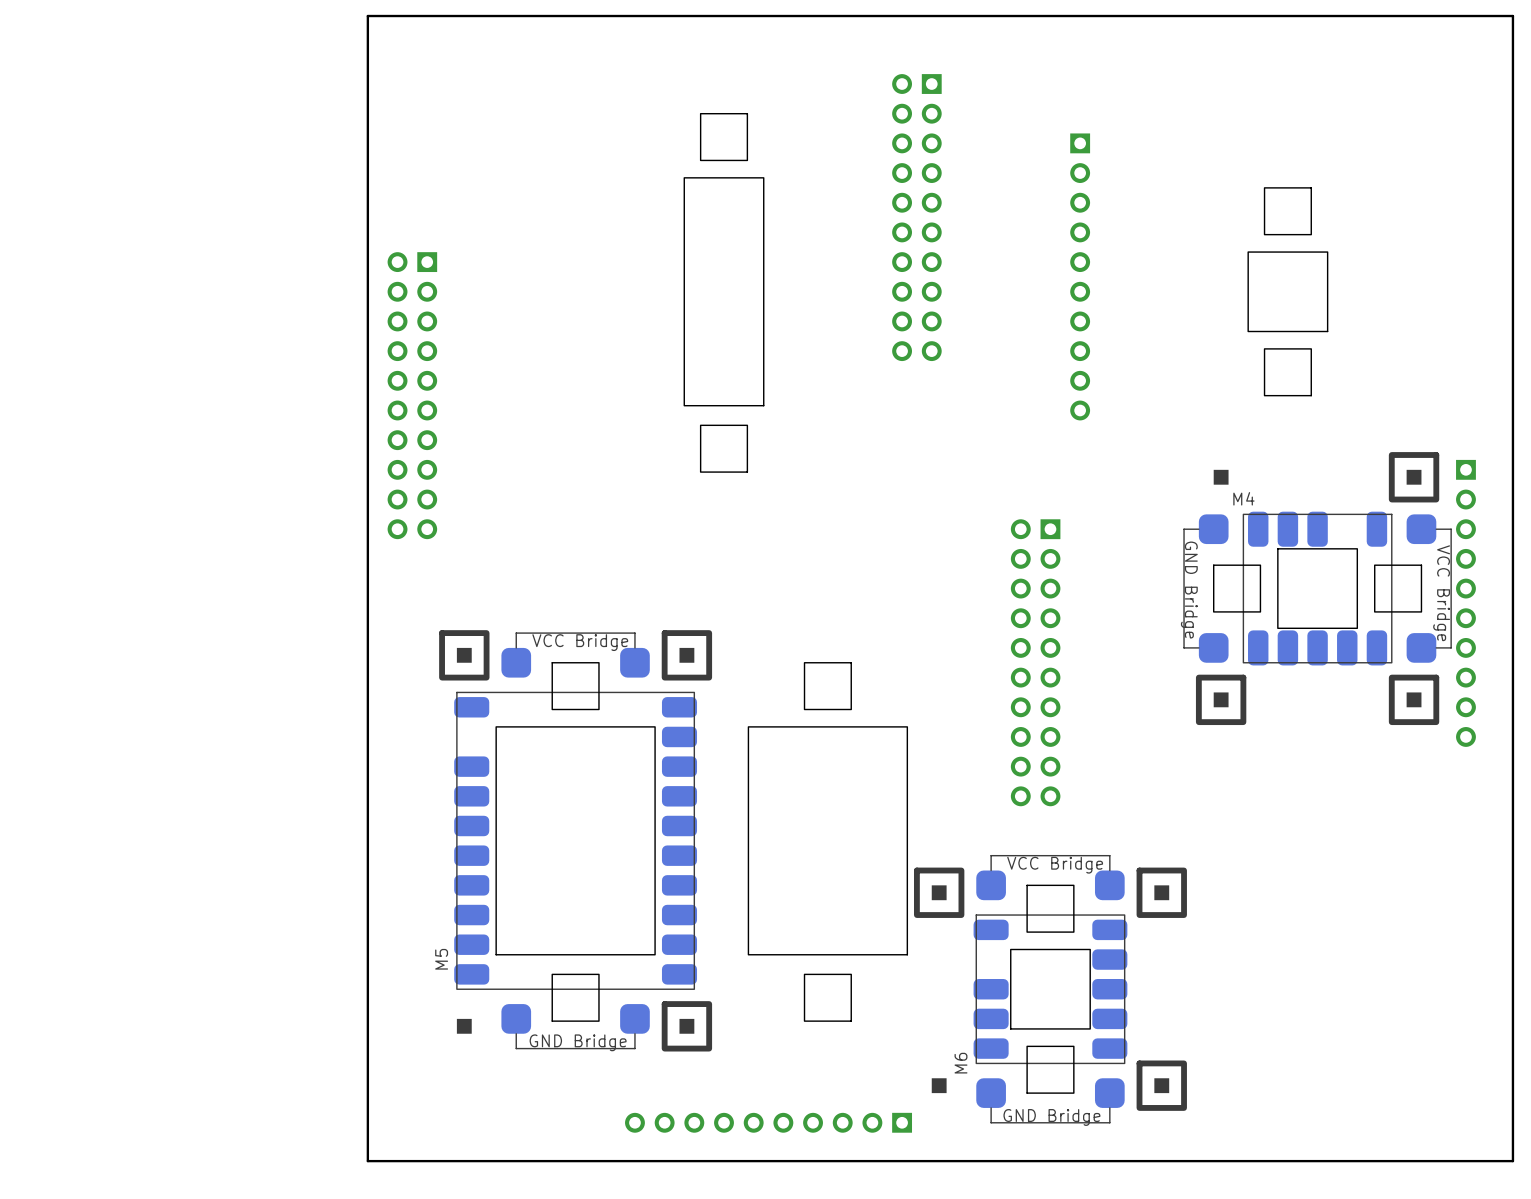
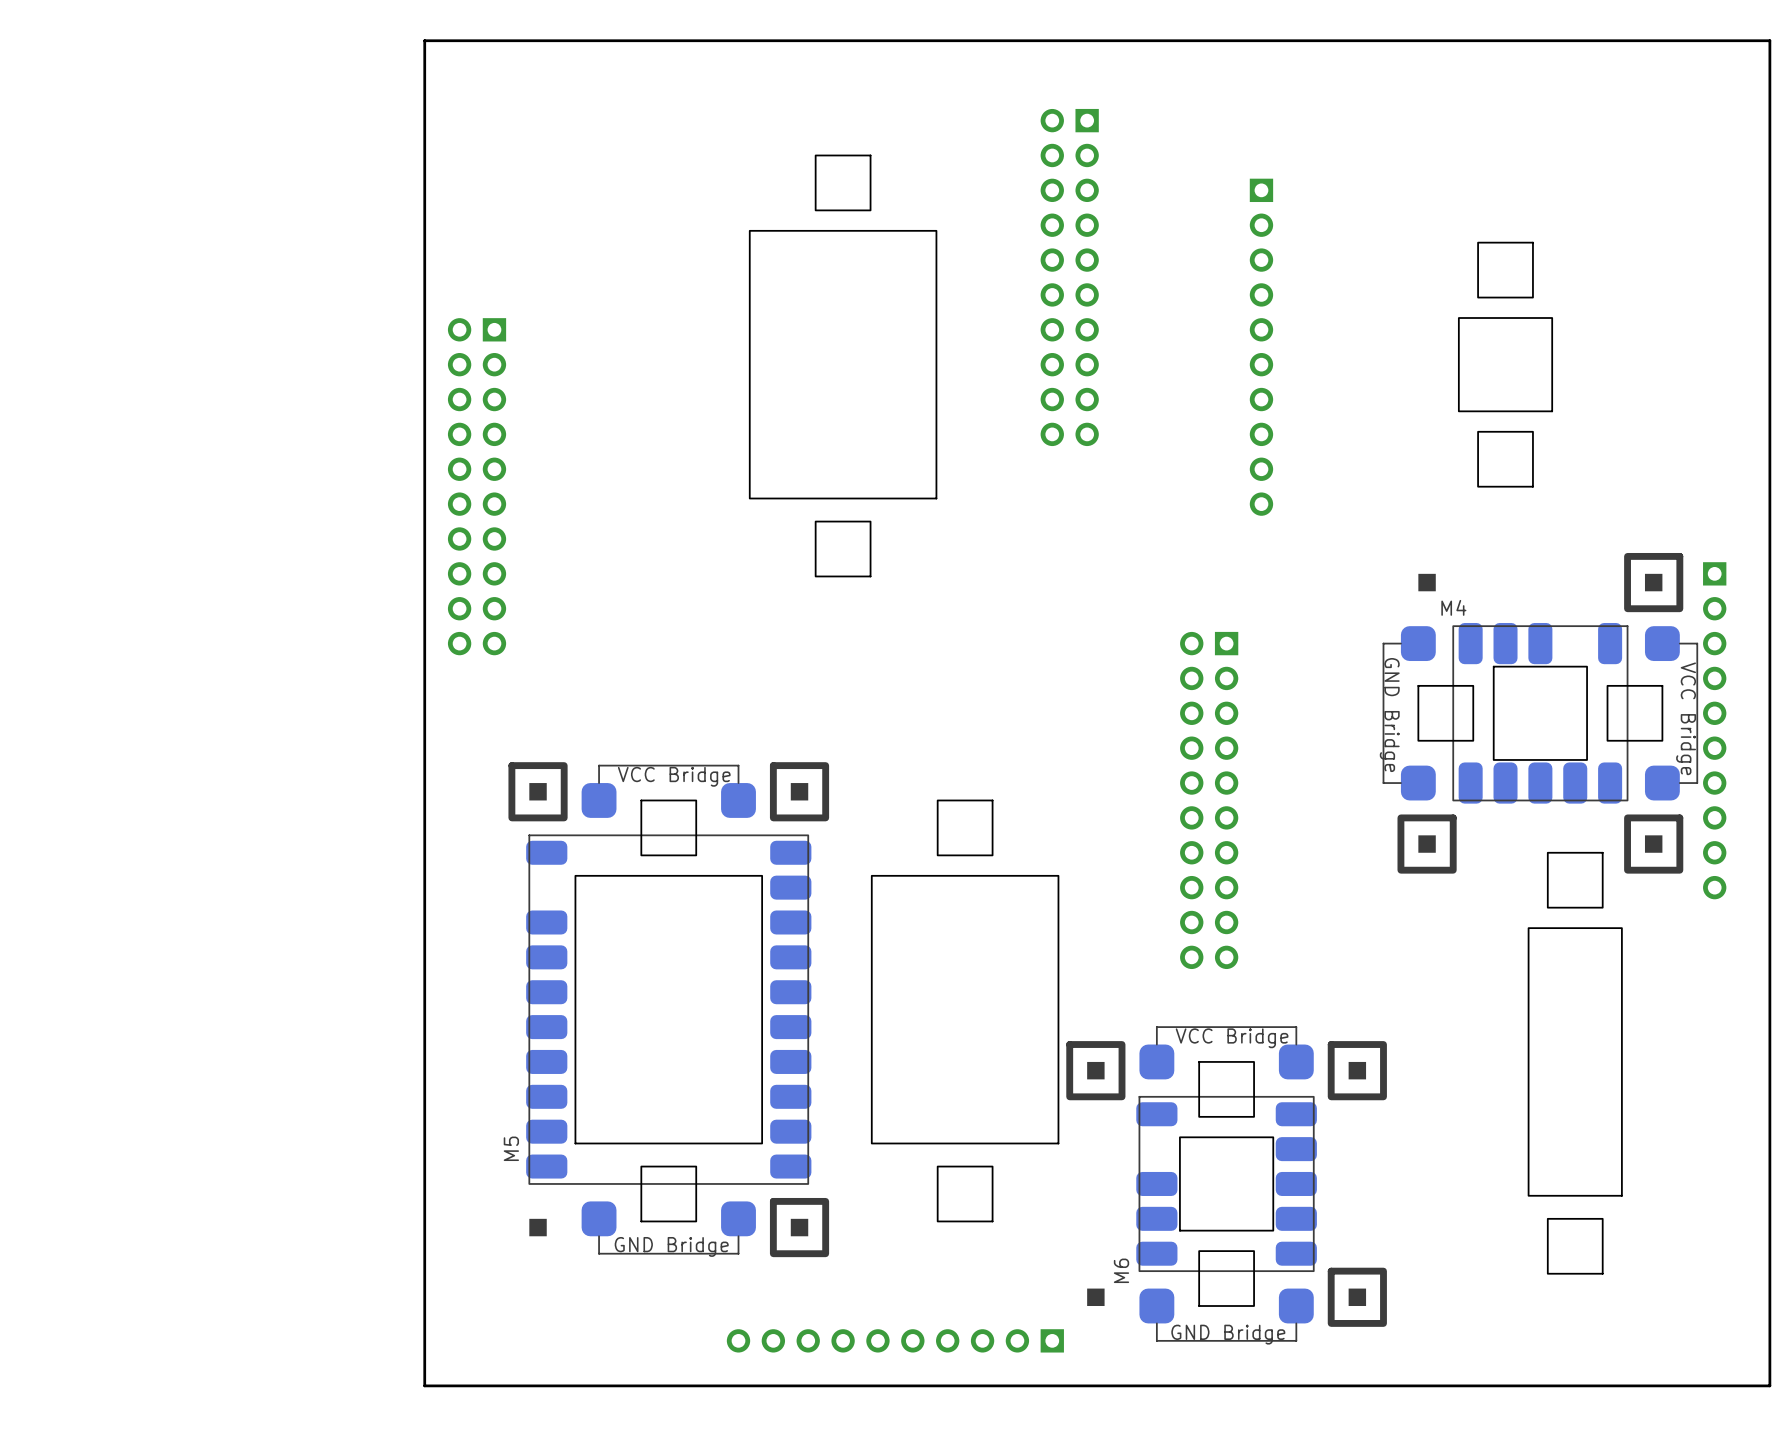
part footprint: [683, 113, 765, 473] -> [749, 155, 937, 577]
part: none -> (1575, 1063)

